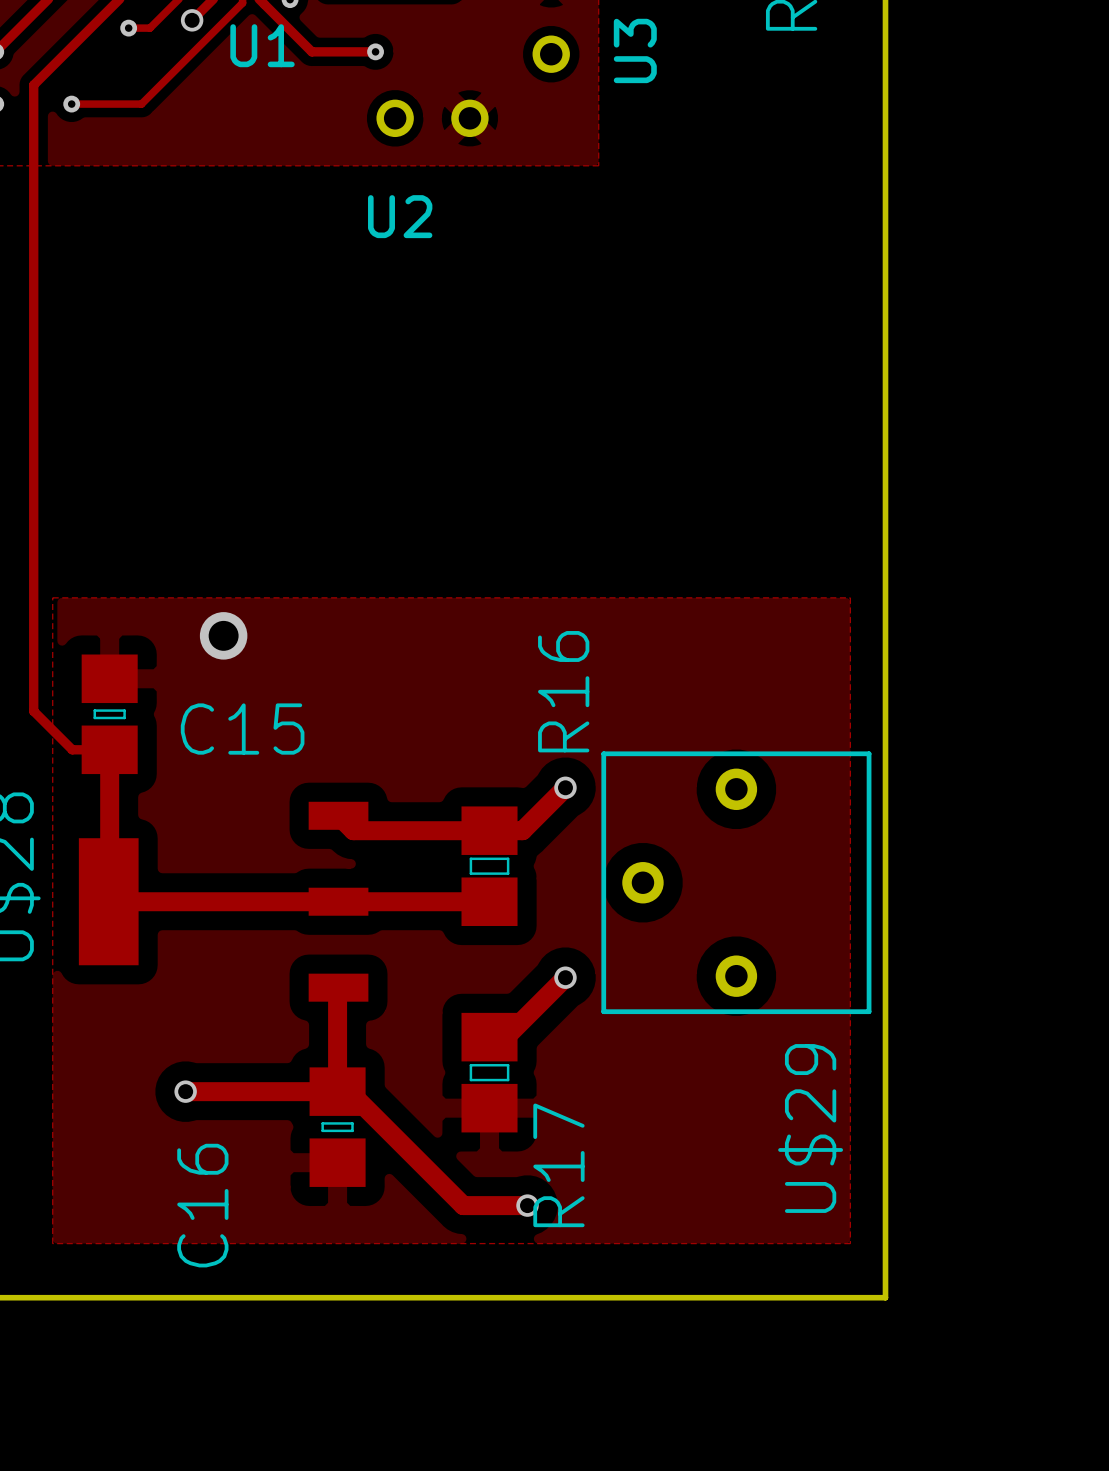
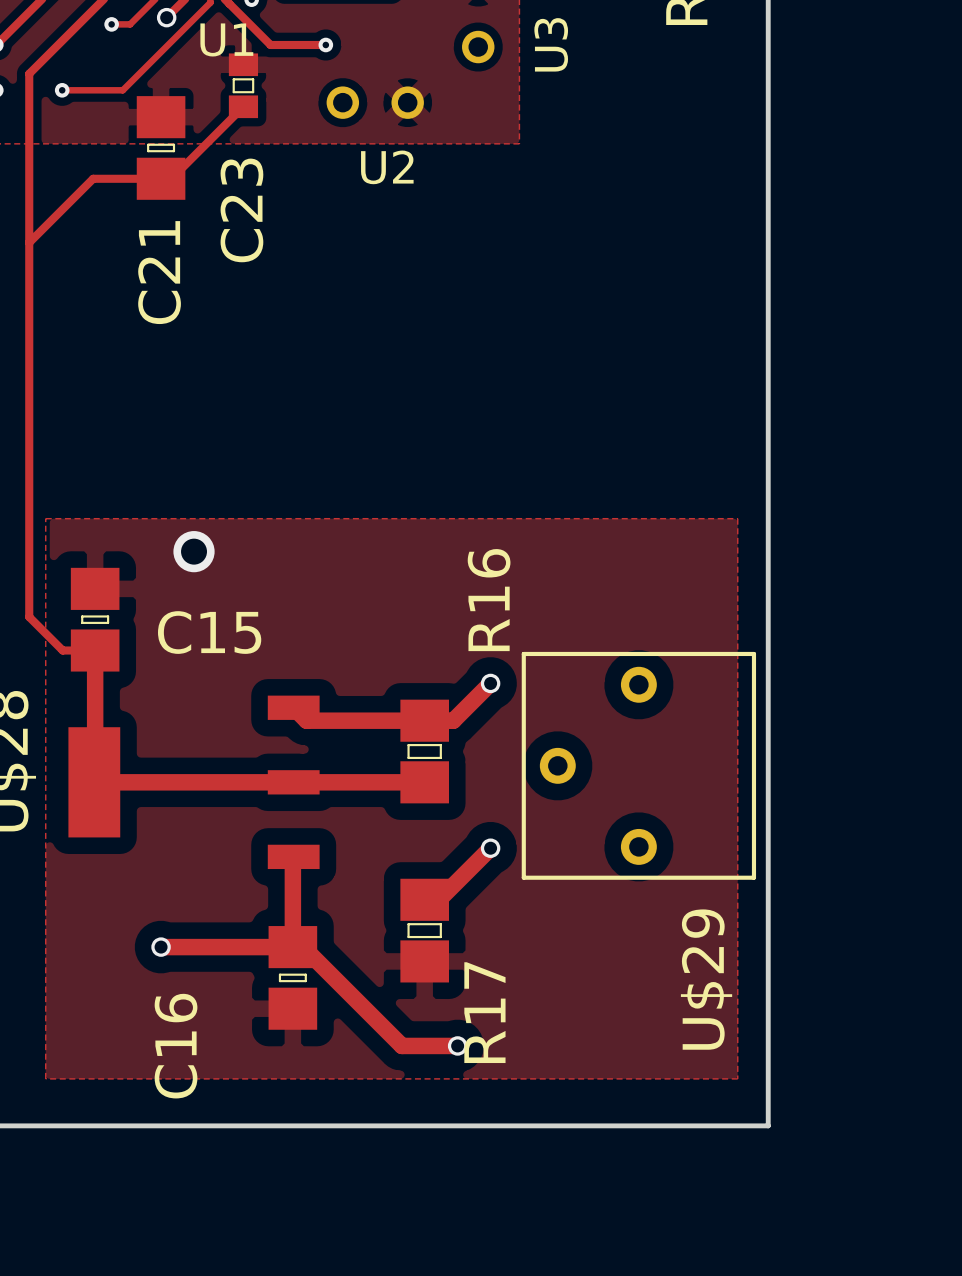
C23: none -> (243, 85)
track: none -> (243, 106) (171, 178) (93, 178) (29, 242)
C21: none -> (161, 147)
U2 name position: U2 (400, 216) -> U2 (387, 167)

